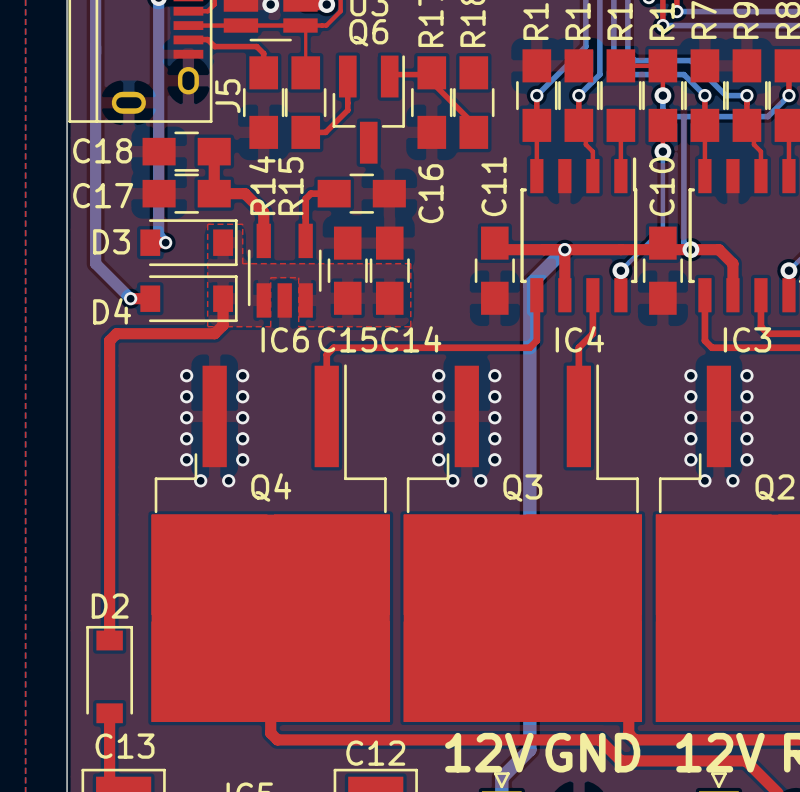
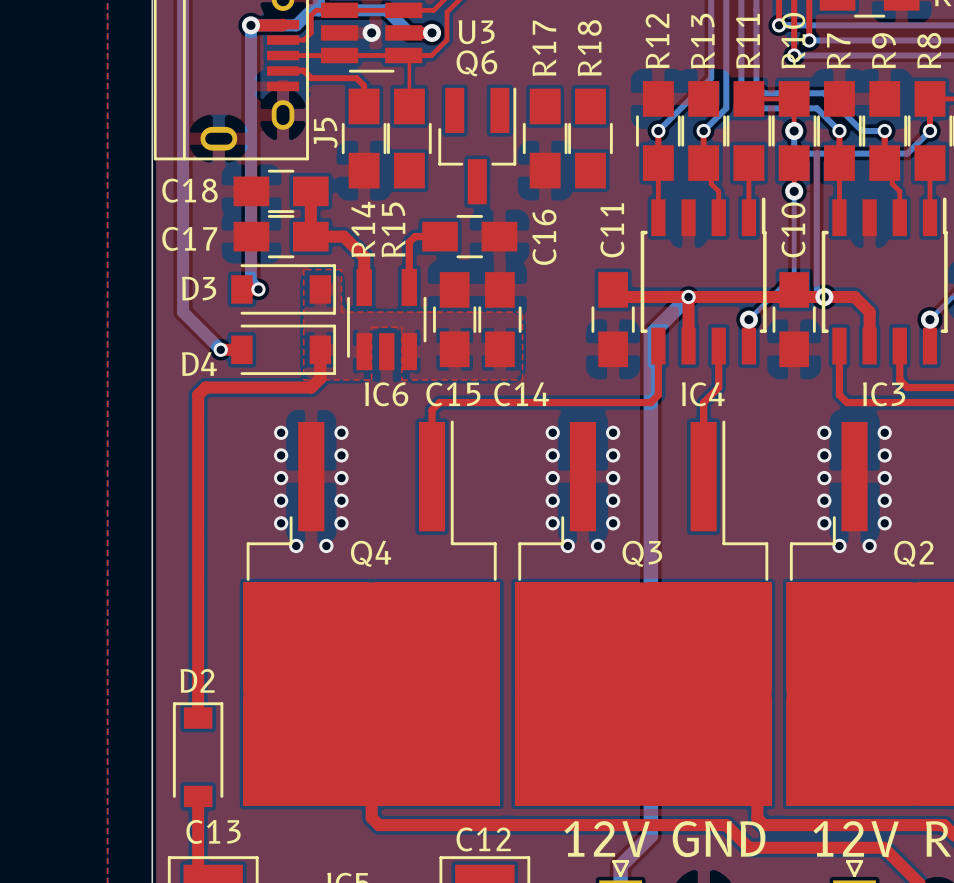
top track: (347, 76) (347, 110) (325, 132) (305, 132) -> none
top track: (389, 76) (391, 74) (430, 74) (431, 72) (431, 82) (473, 124) (473, 132) -> none

